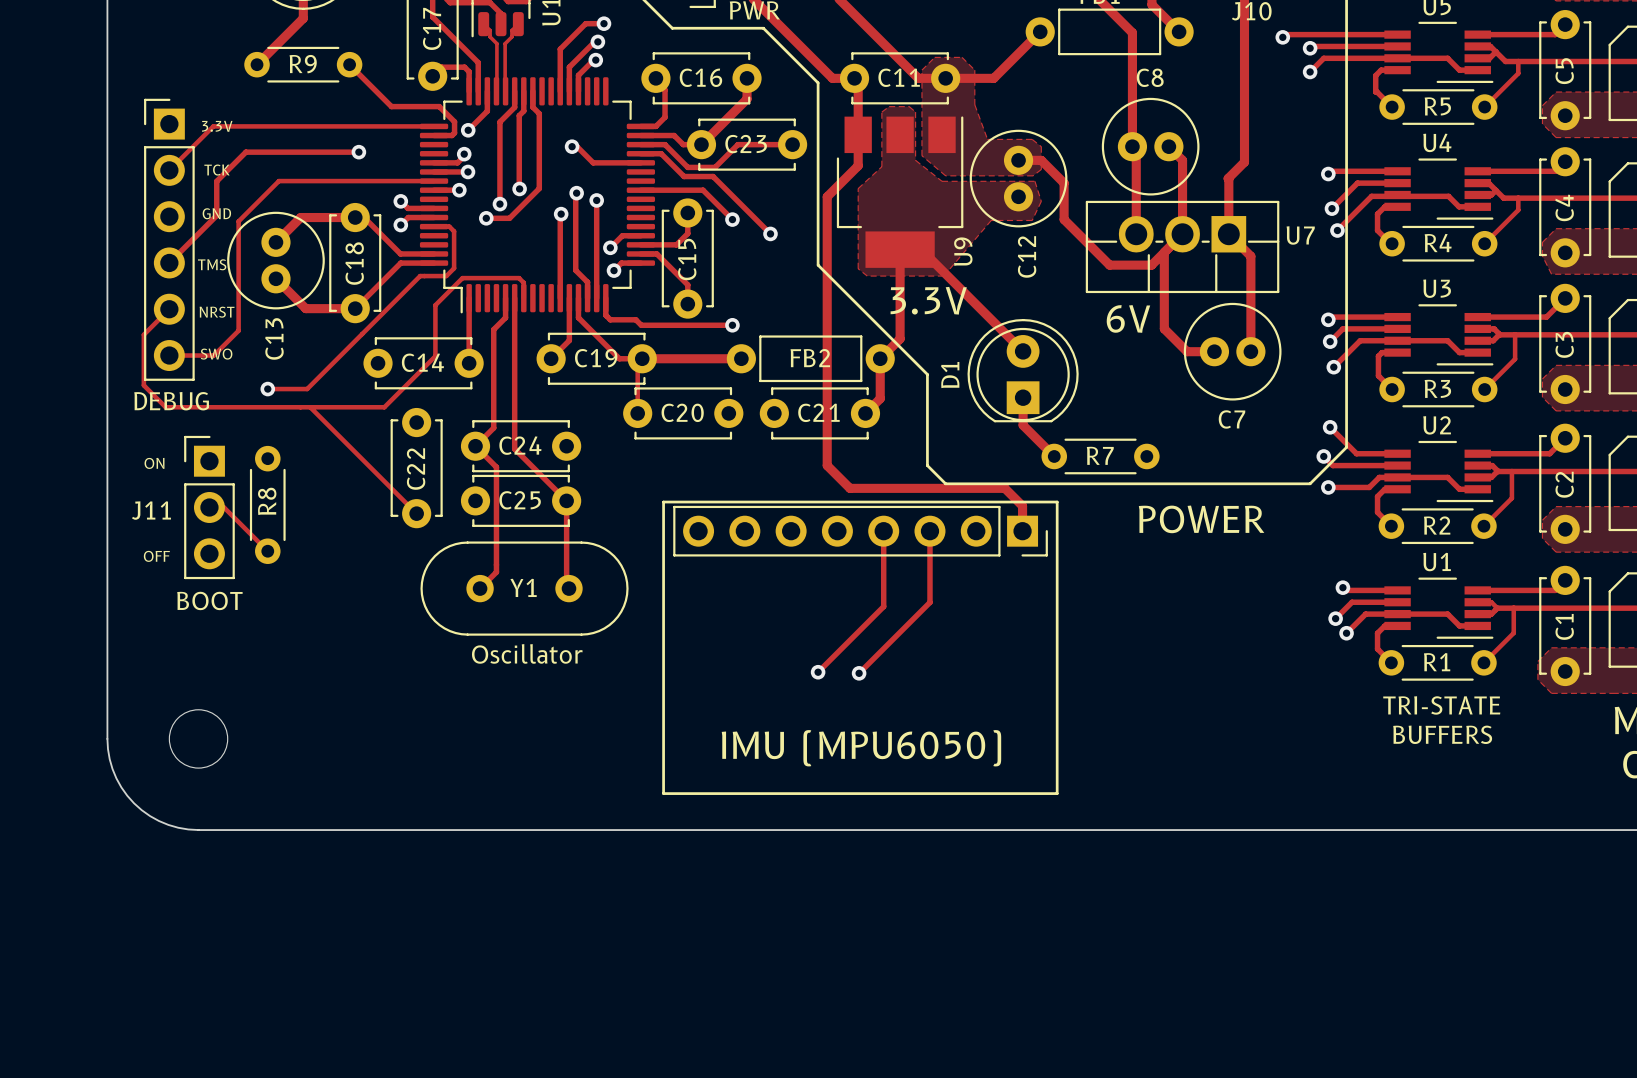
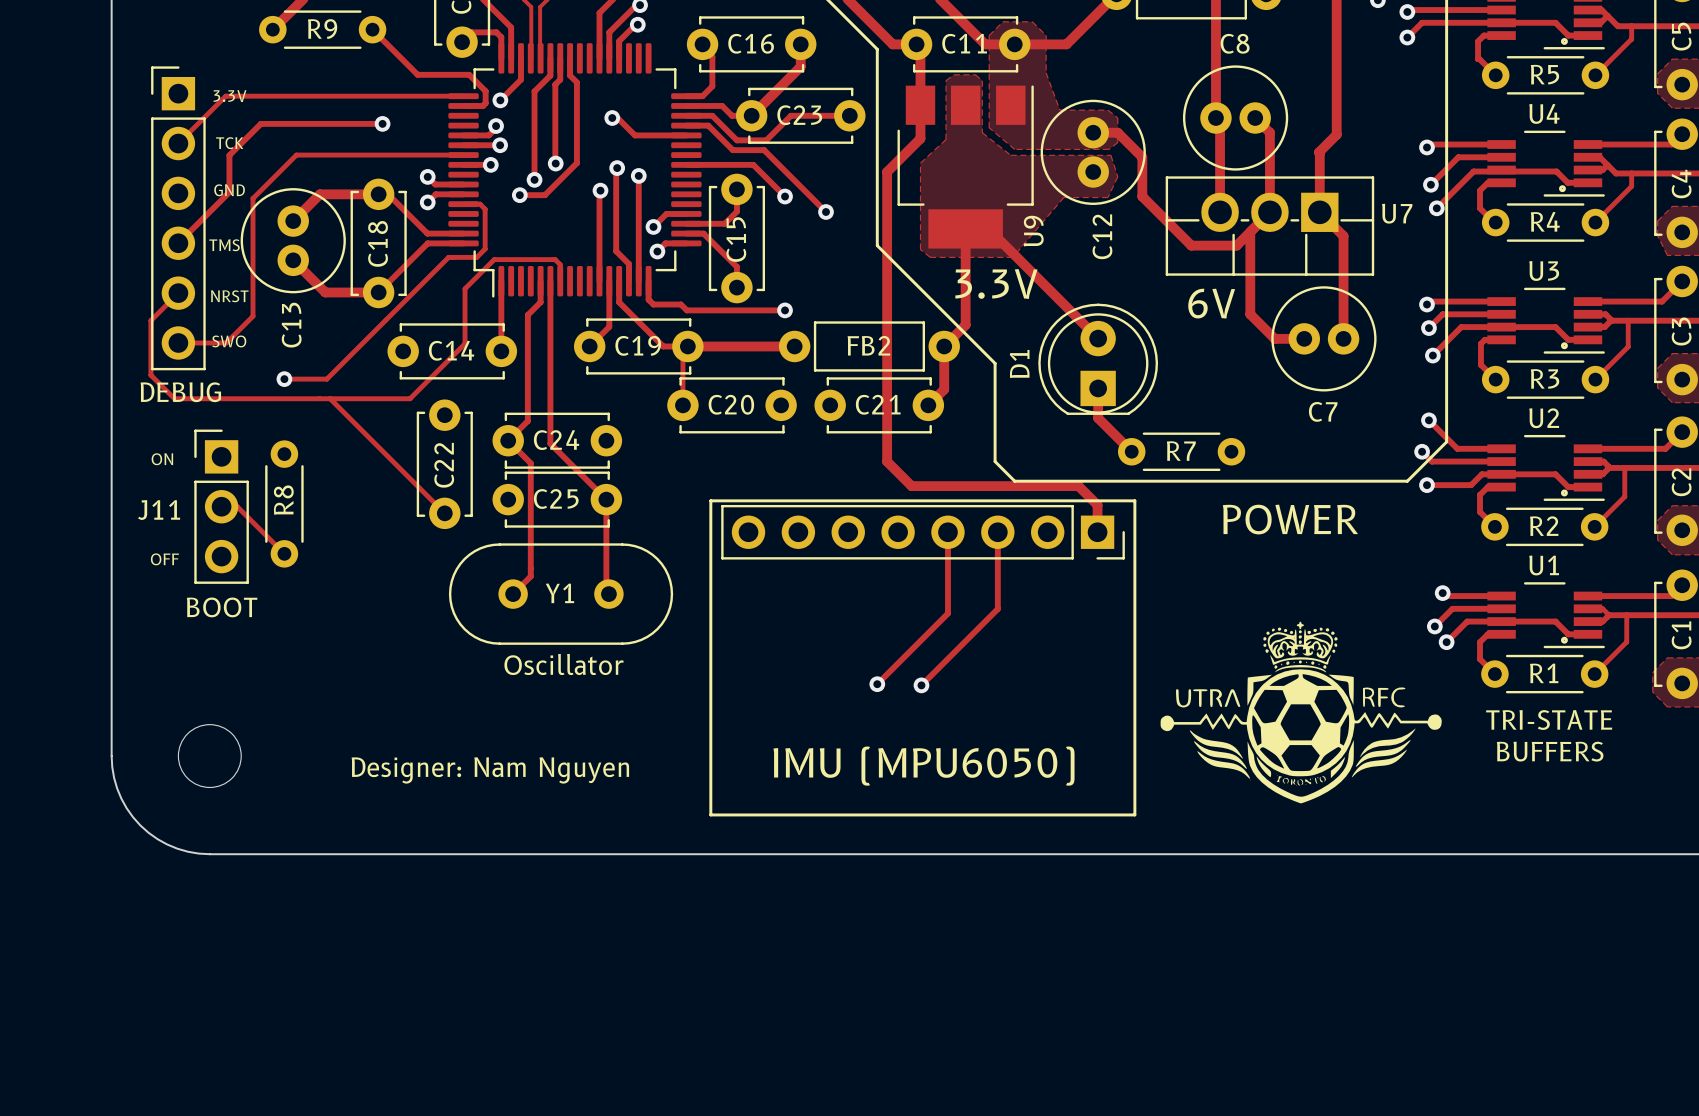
drawing: none -> [1560, 38, 1568, 45]
drawing: none -> [1559, 185, 1566, 193]
drawing: none -> [1560, 342, 1568, 350]
drawing: none -> [1560, 489, 1568, 497]
drawing: none -> [1160, 621, 1442, 804]
drawing: none -> [1560, 636, 1568, 644]
text: none -> Designer: Nam Nguyen (490, 770)

